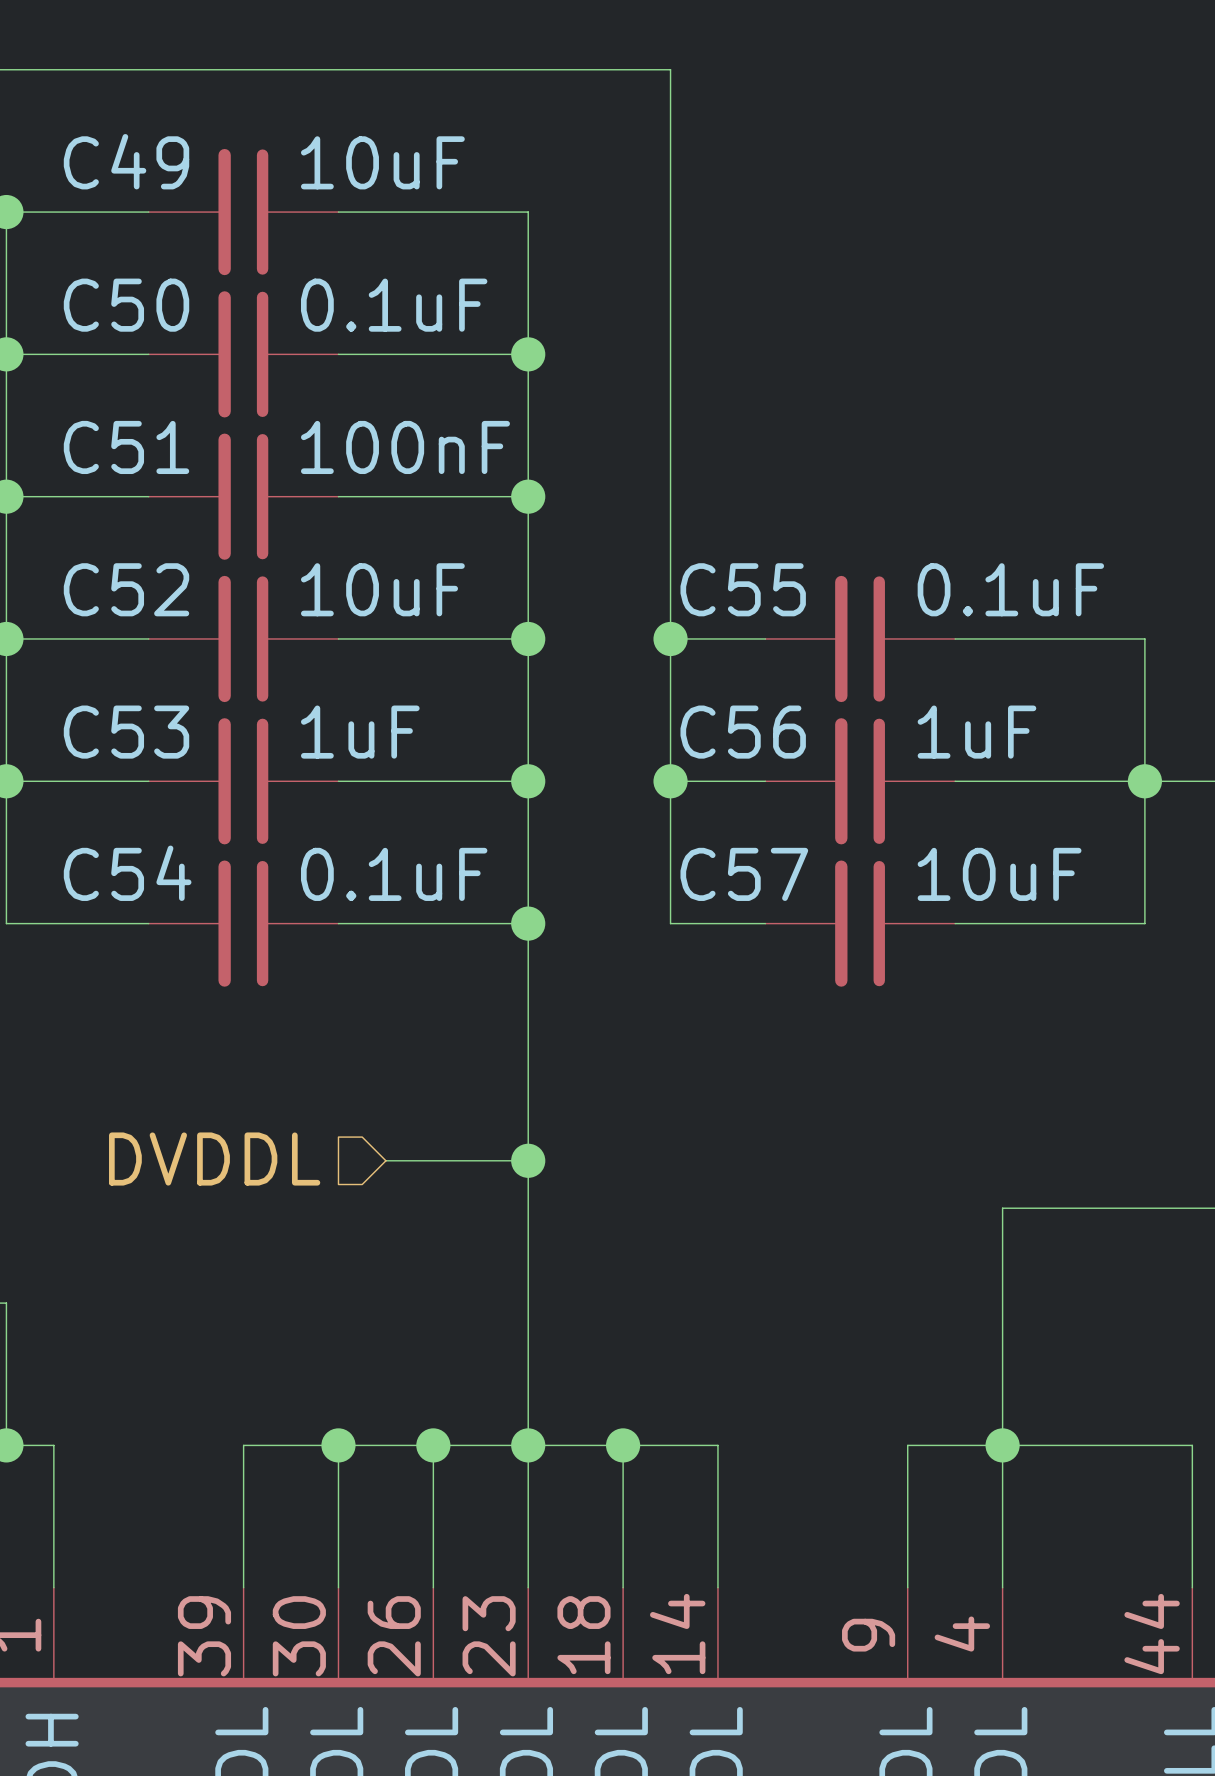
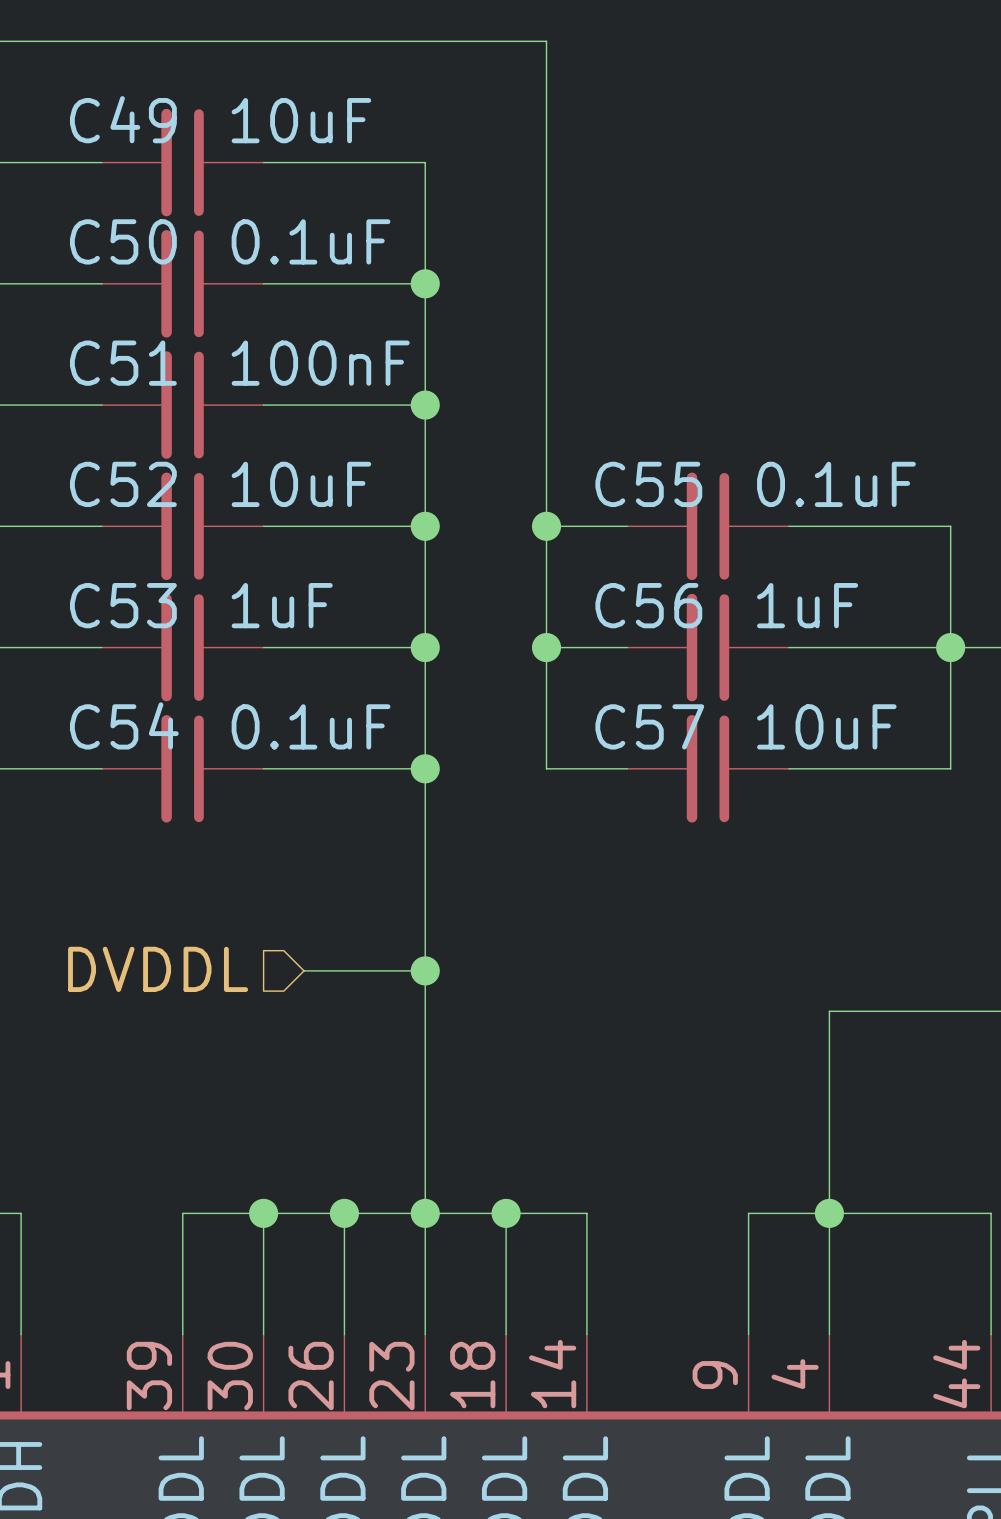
C49 name position: C49 (126, 161) -> C49 (123, 119)
C50 name position: C50 (126, 305) -> C50 (123, 241)
C51 name position: C51 (126, 447) -> C51 (123, 363)
C52 name position: C52 (126, 589) -> C52 (123, 484)
C55 name position: C55 (743, 589) -> C55 (648, 484)
C53 name position: C53 (126, 732) -> C53 (123, 605)
C56 name position: C56 (743, 732) -> C56 (648, 605)
C54 name position: C54 (127, 873) -> C54 (124, 725)
C57 name position: C57 (744, 874) -> C57 (649, 726)

